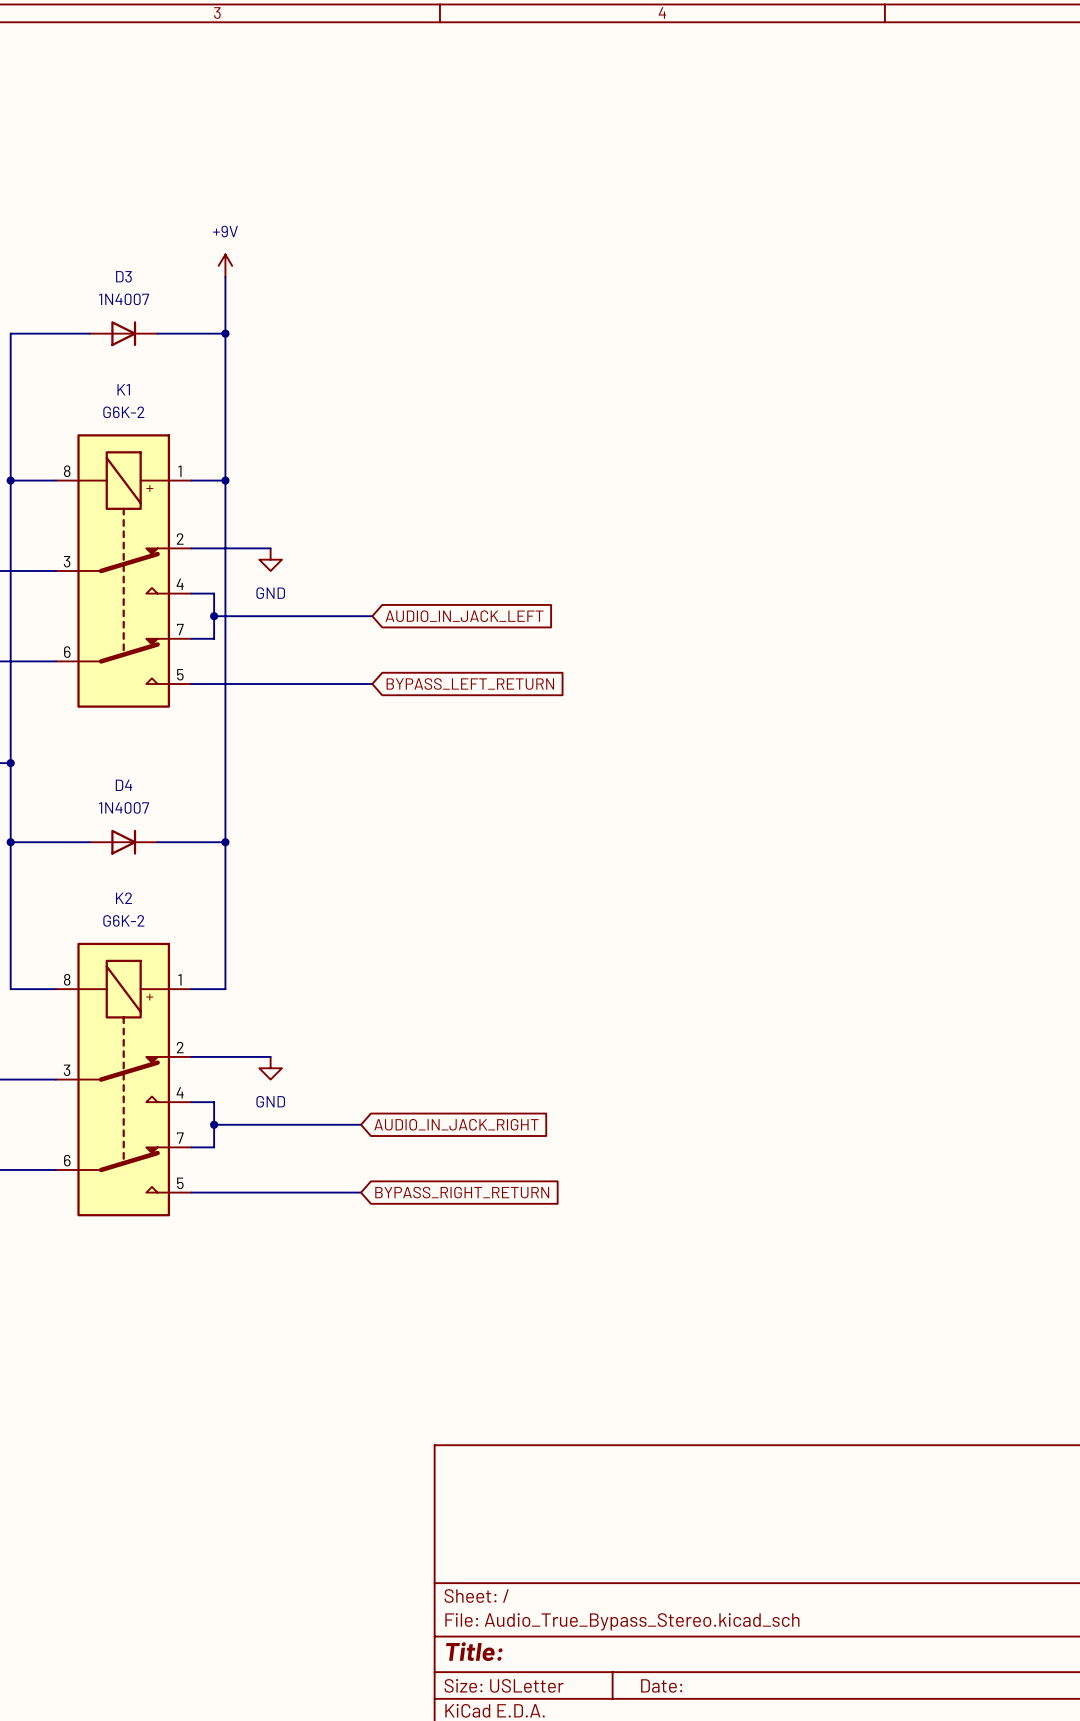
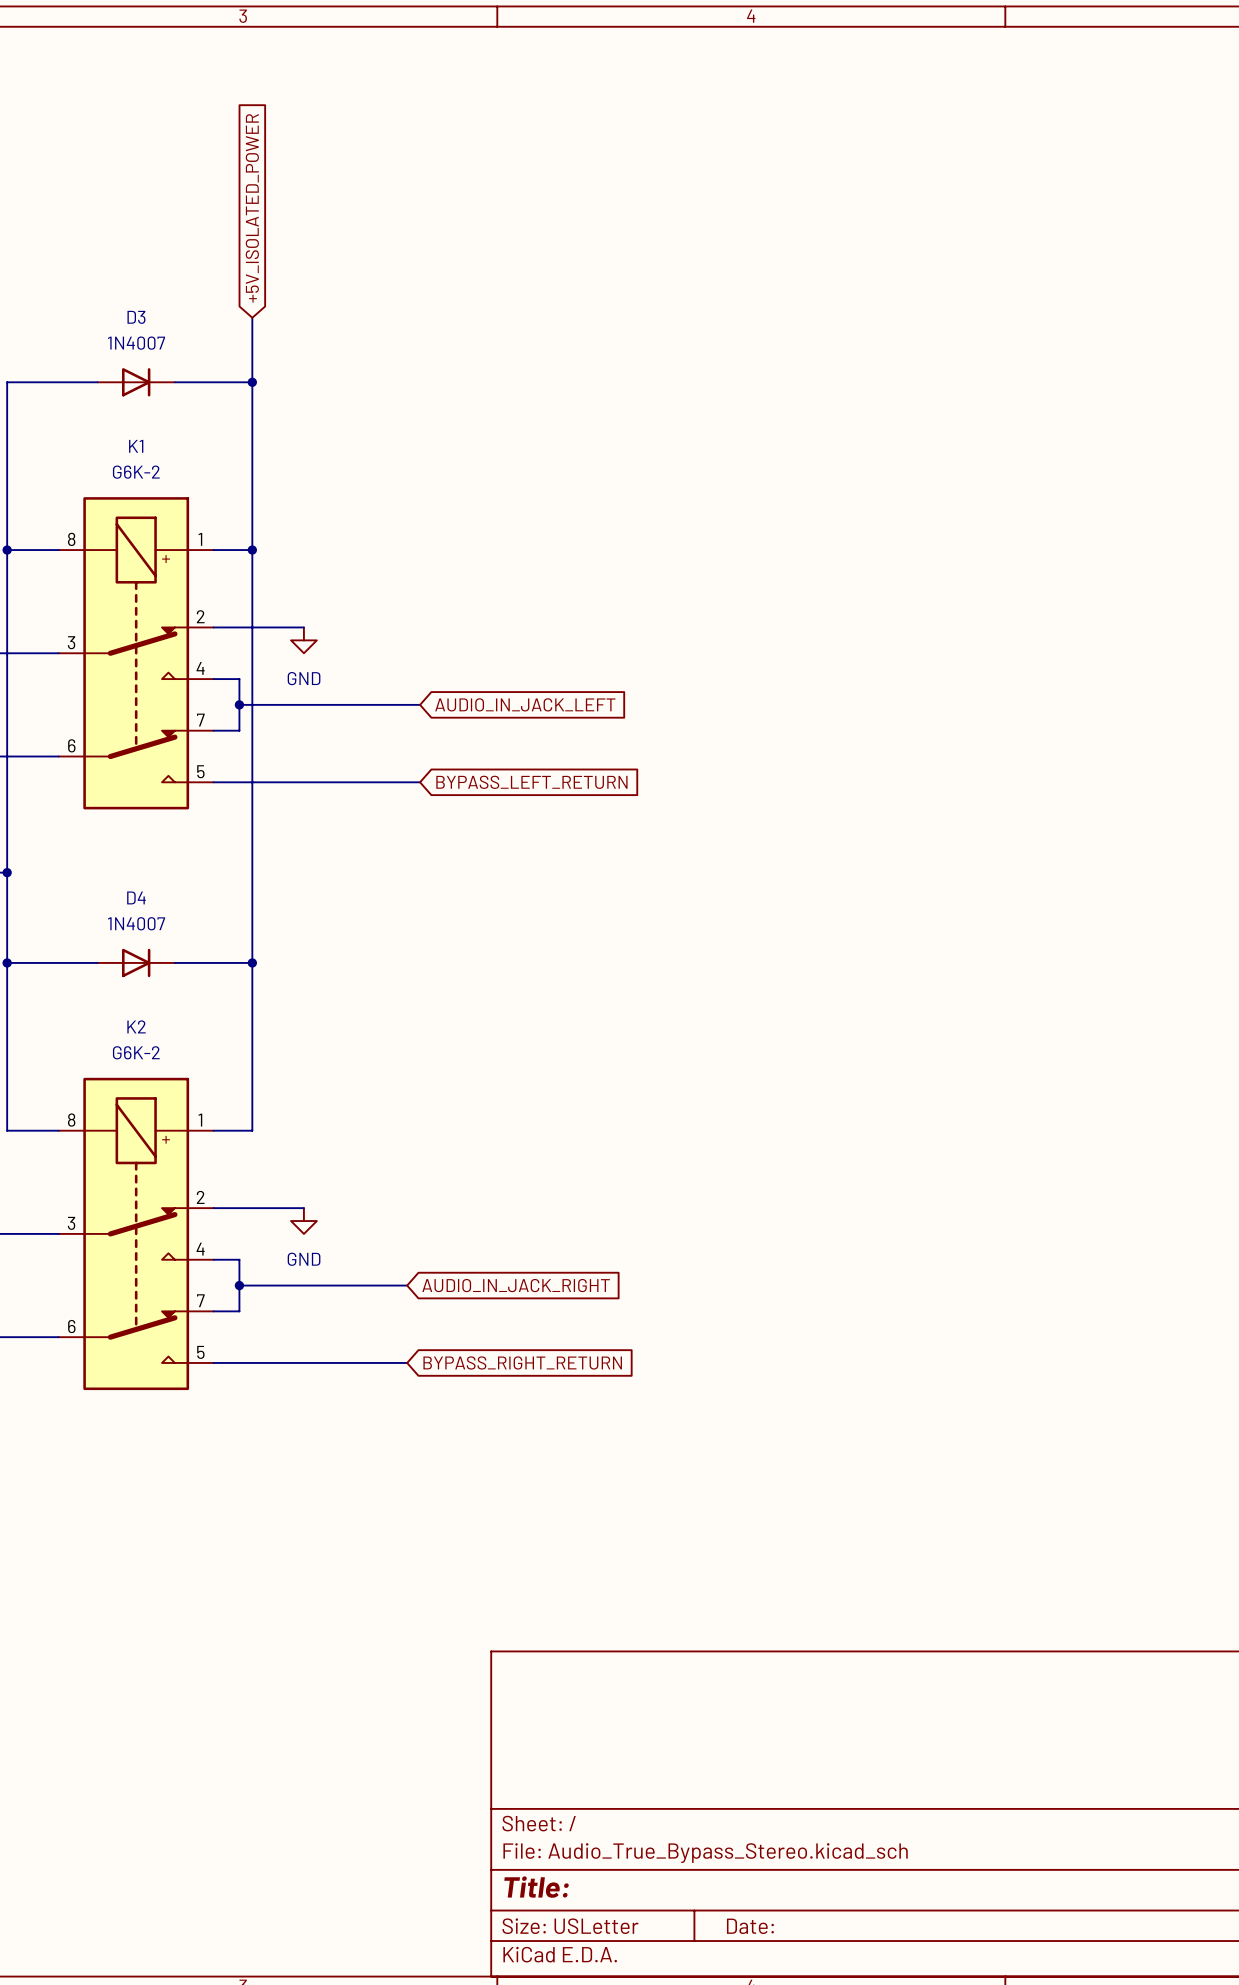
global label: none -> +5V_ISOLATED_POWER (252, 208)
power symbol: +9V (225, 265) -> none

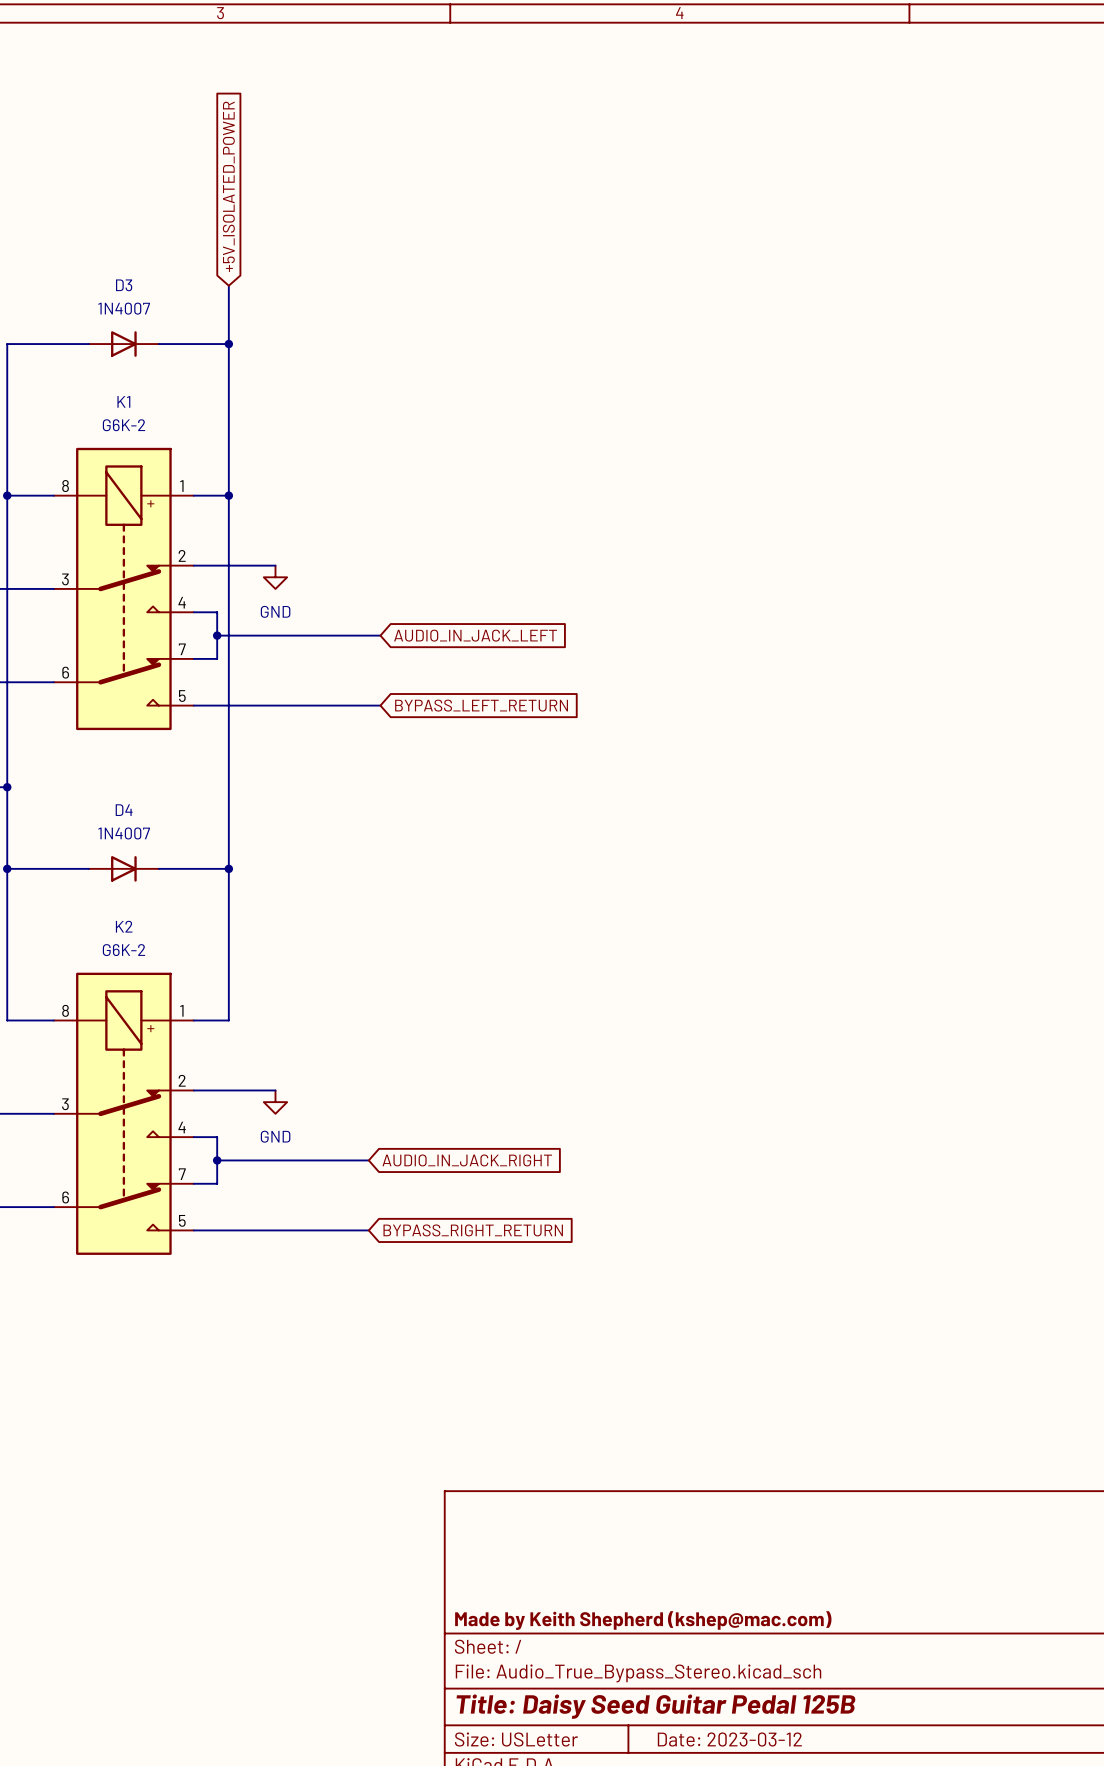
title block: none -> Made by Keith Shepherd (kshep@mac.com) (643, 1620)
title block: Title: (536, 1887) -> Title: Daisy Seed Guitar Pedal 125B (656, 1706)
title block: Date: (750, 1926) -> Date: 2023-03-12 (729, 1739)

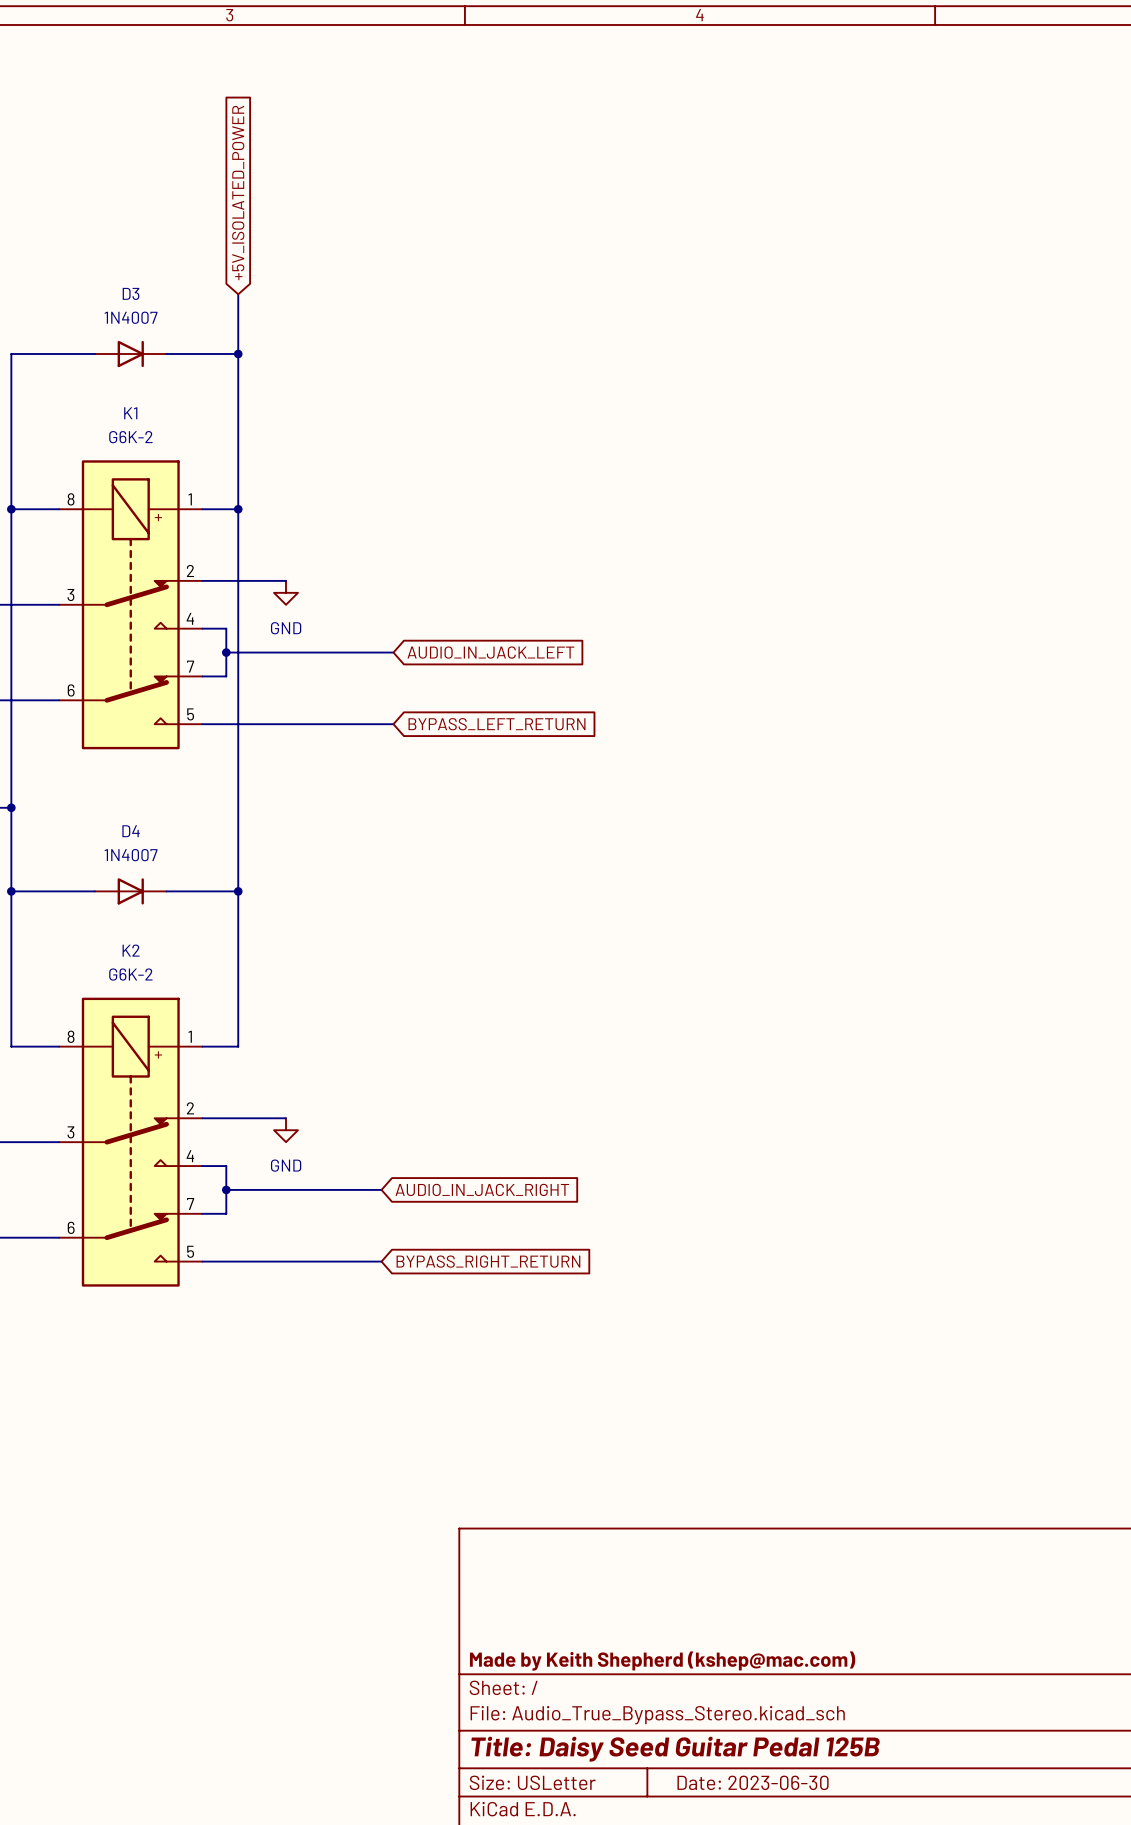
title block: Date: 2023-03-12 (729, 1739) -> Date: 2023-06-30 (753, 1782)

